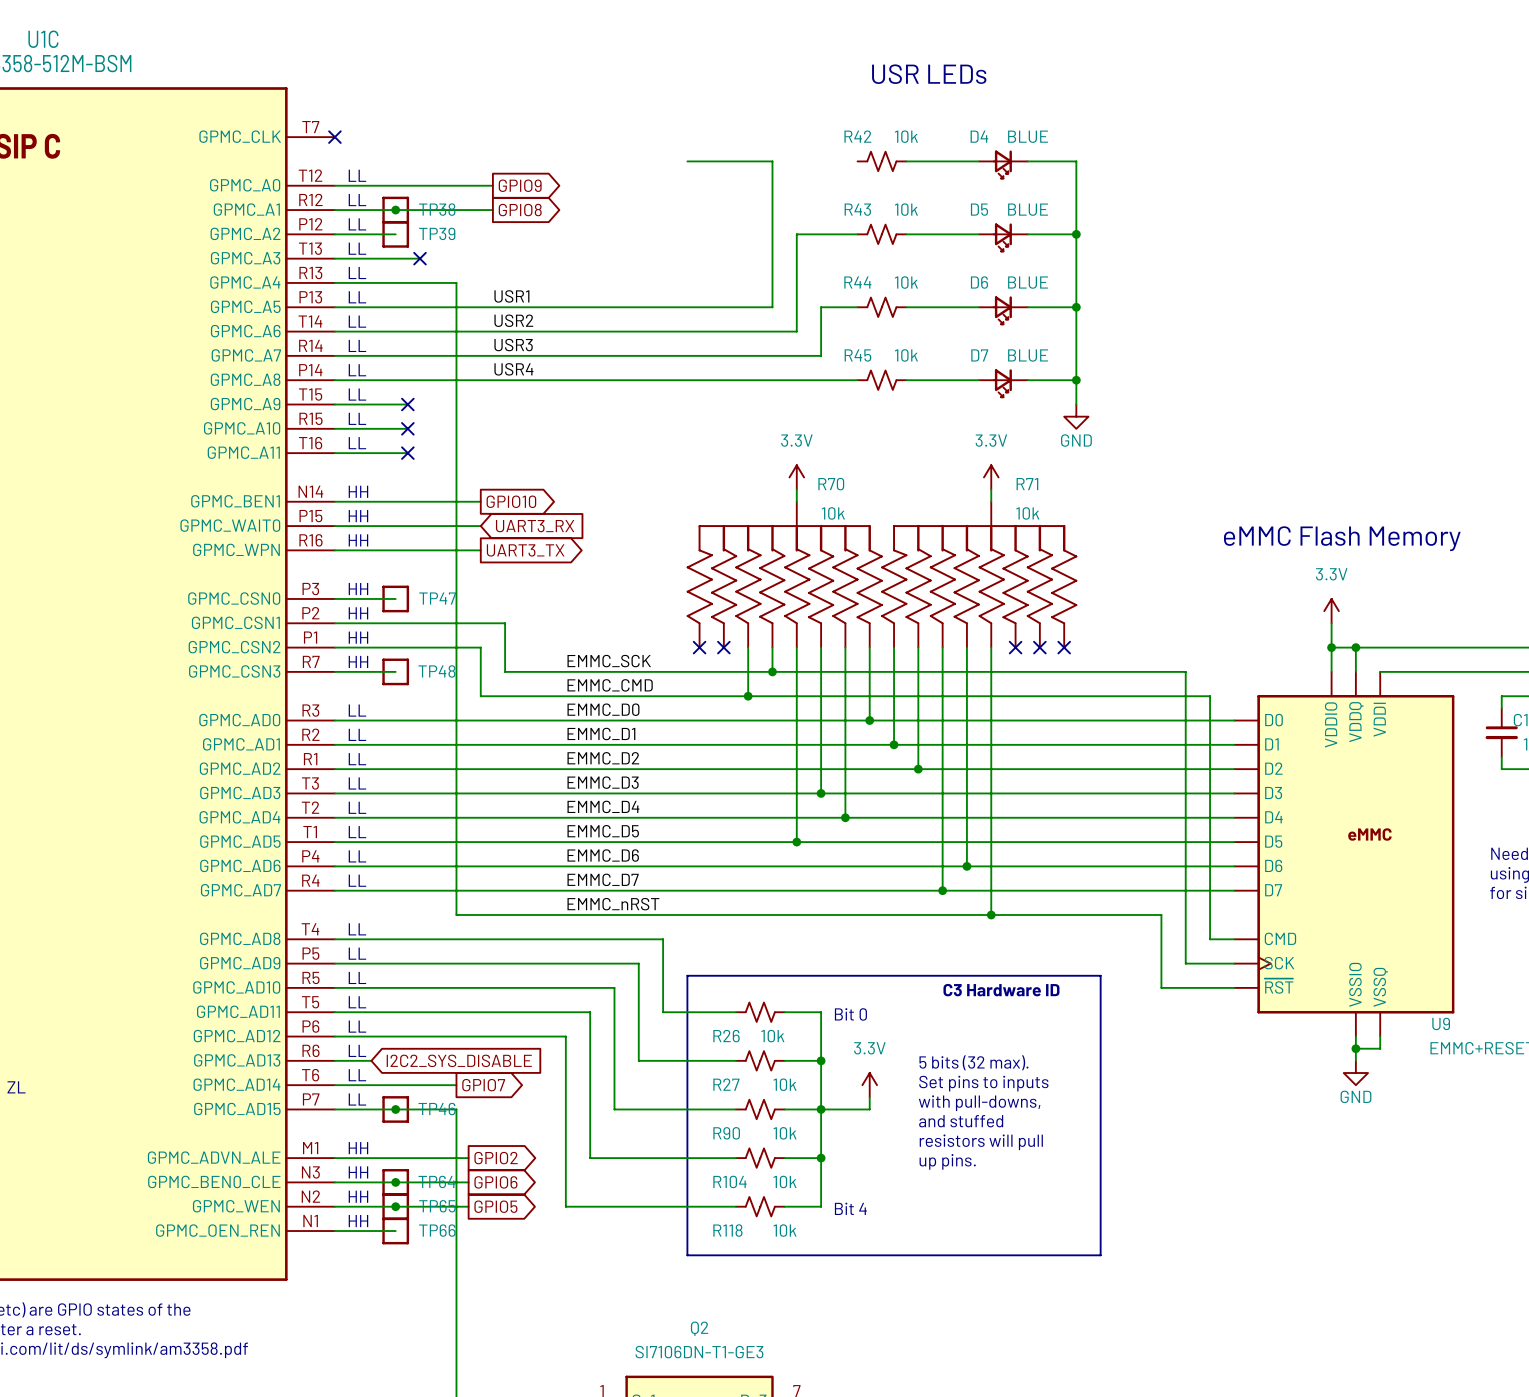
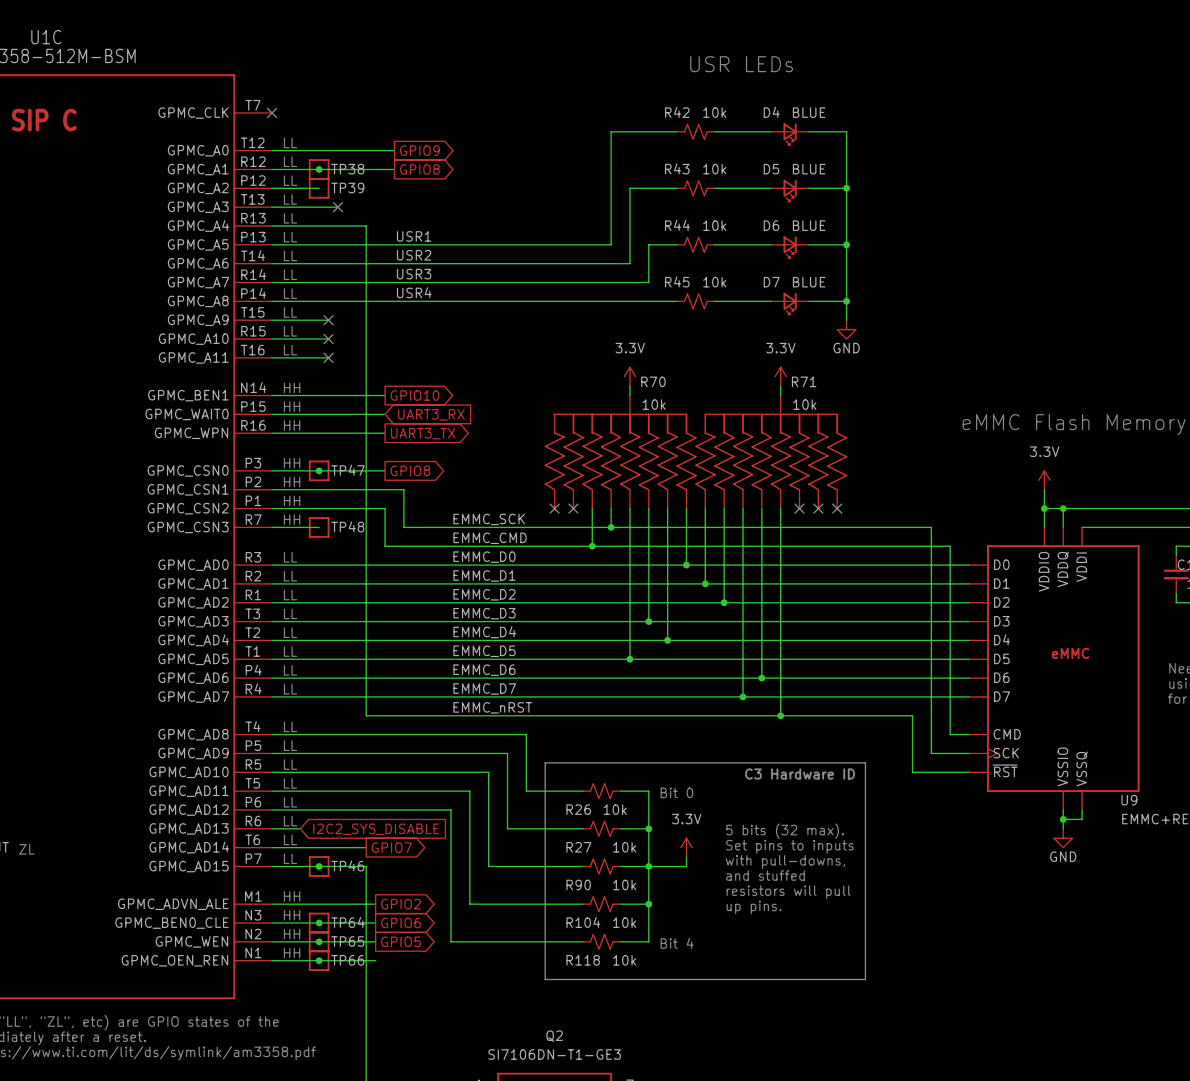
wire: (687, 161) (772, 161) -> (677, 131) (611, 131)
wire: none -> (319, 470) (385, 470)
junction: none -> (319, 470)
global label: none -> GPIO8 (410, 470)
wire: none -> (319, 960) (375, 960)
junction: none -> (319, 960)

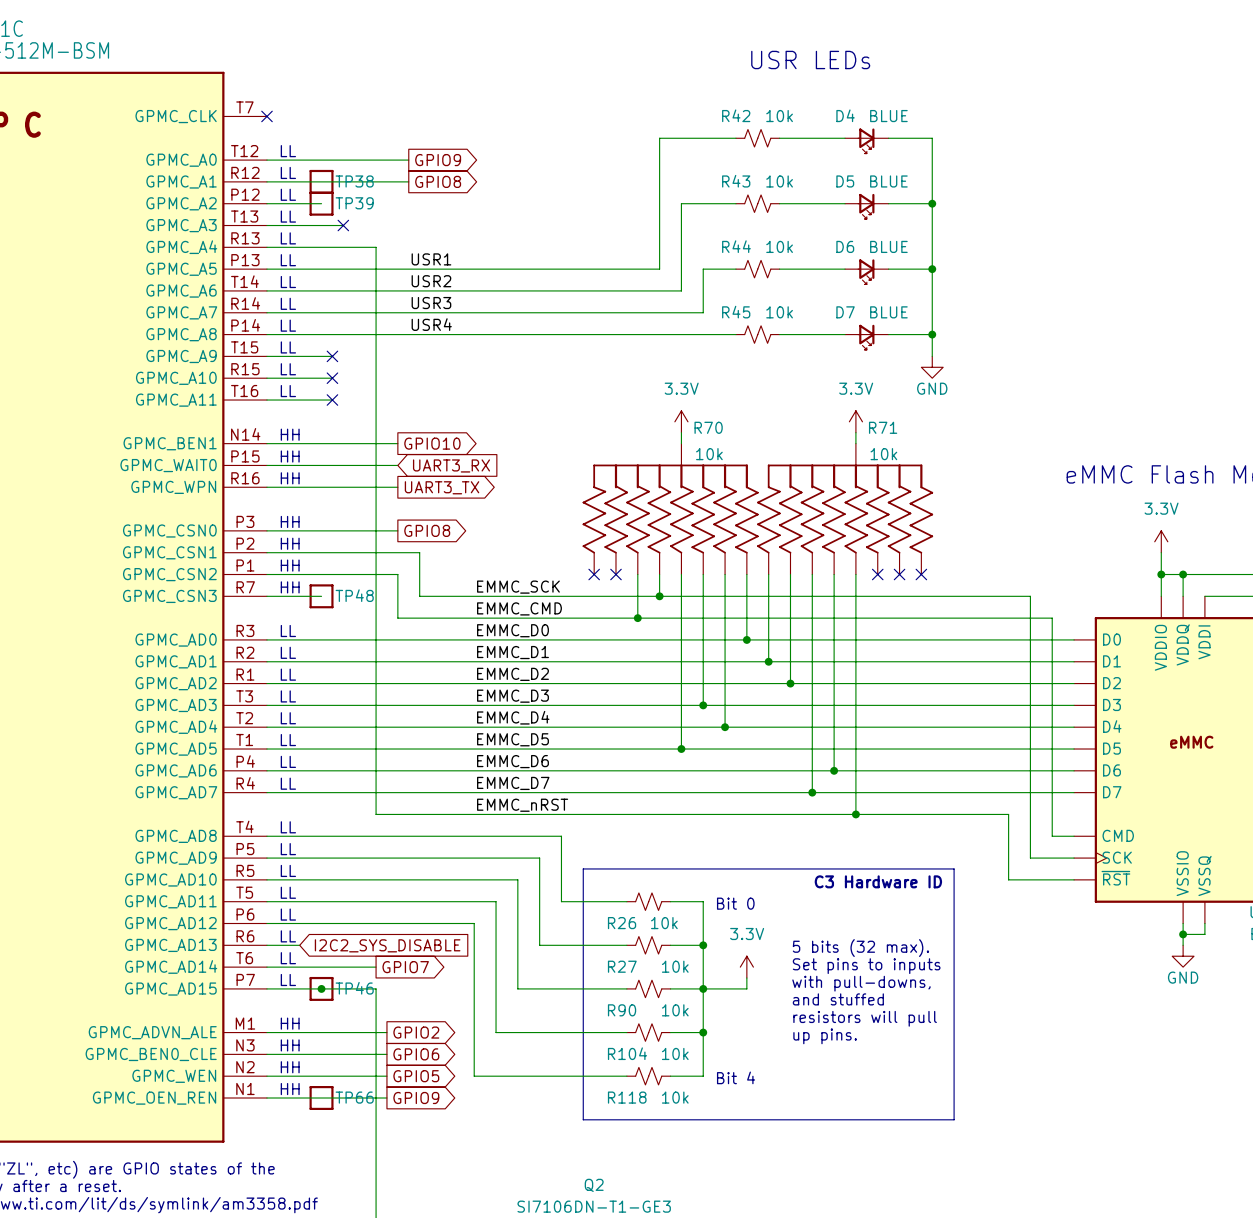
junction: (319, 169) -> none
junction: (319, 470) -> none
TP47: (319, 470) -> none
junction: (319, 923) -> none
TP64: (319, 923) -> none
junction: (319, 941) -> none
TP65: (319, 941) -> none
junction: (319, 960) -> none
global label: none -> GPIO9 (416, 1098)

